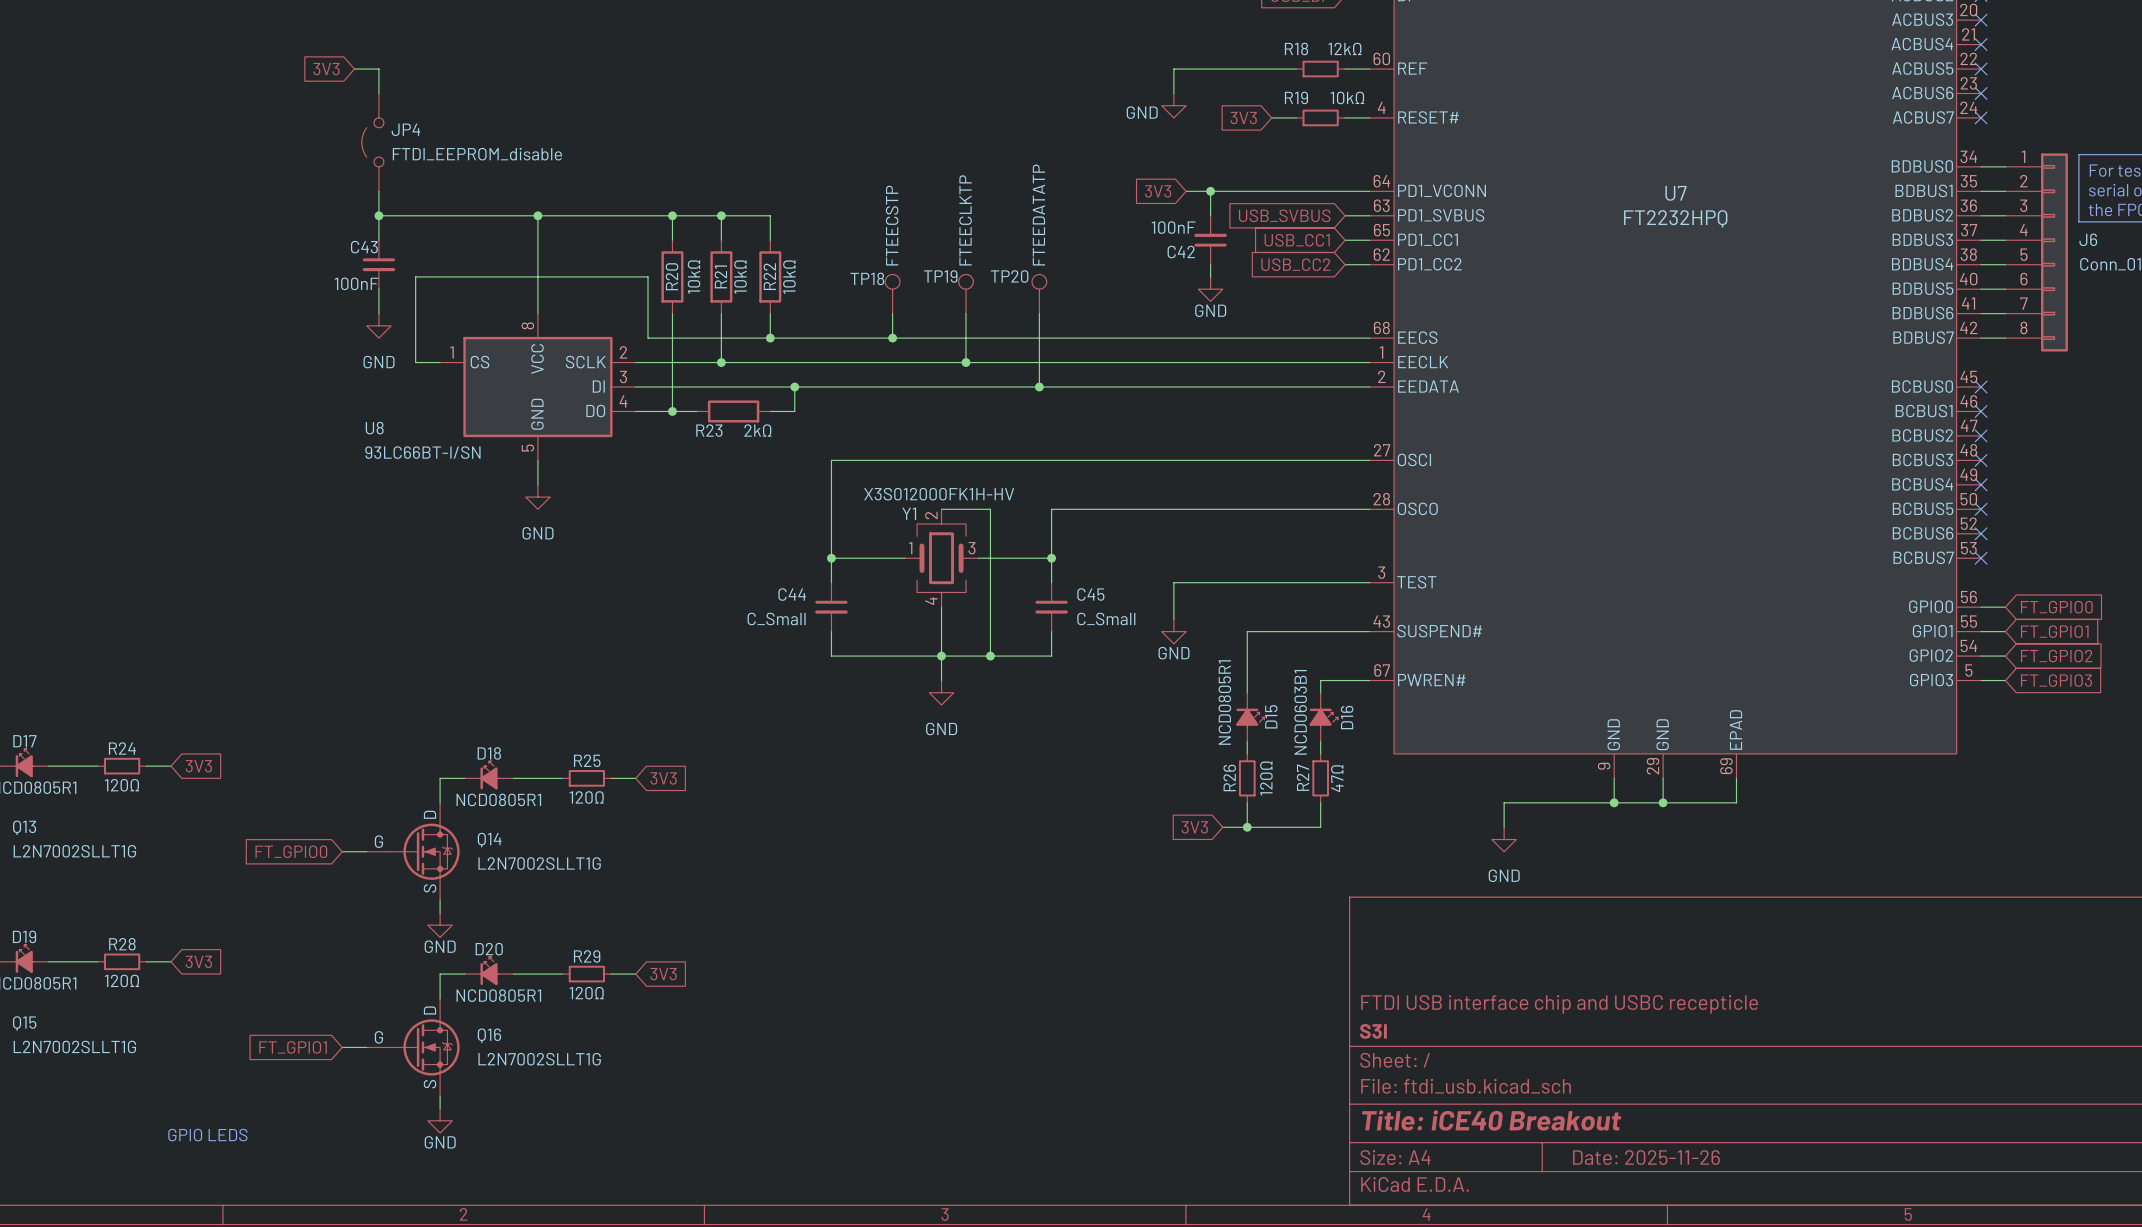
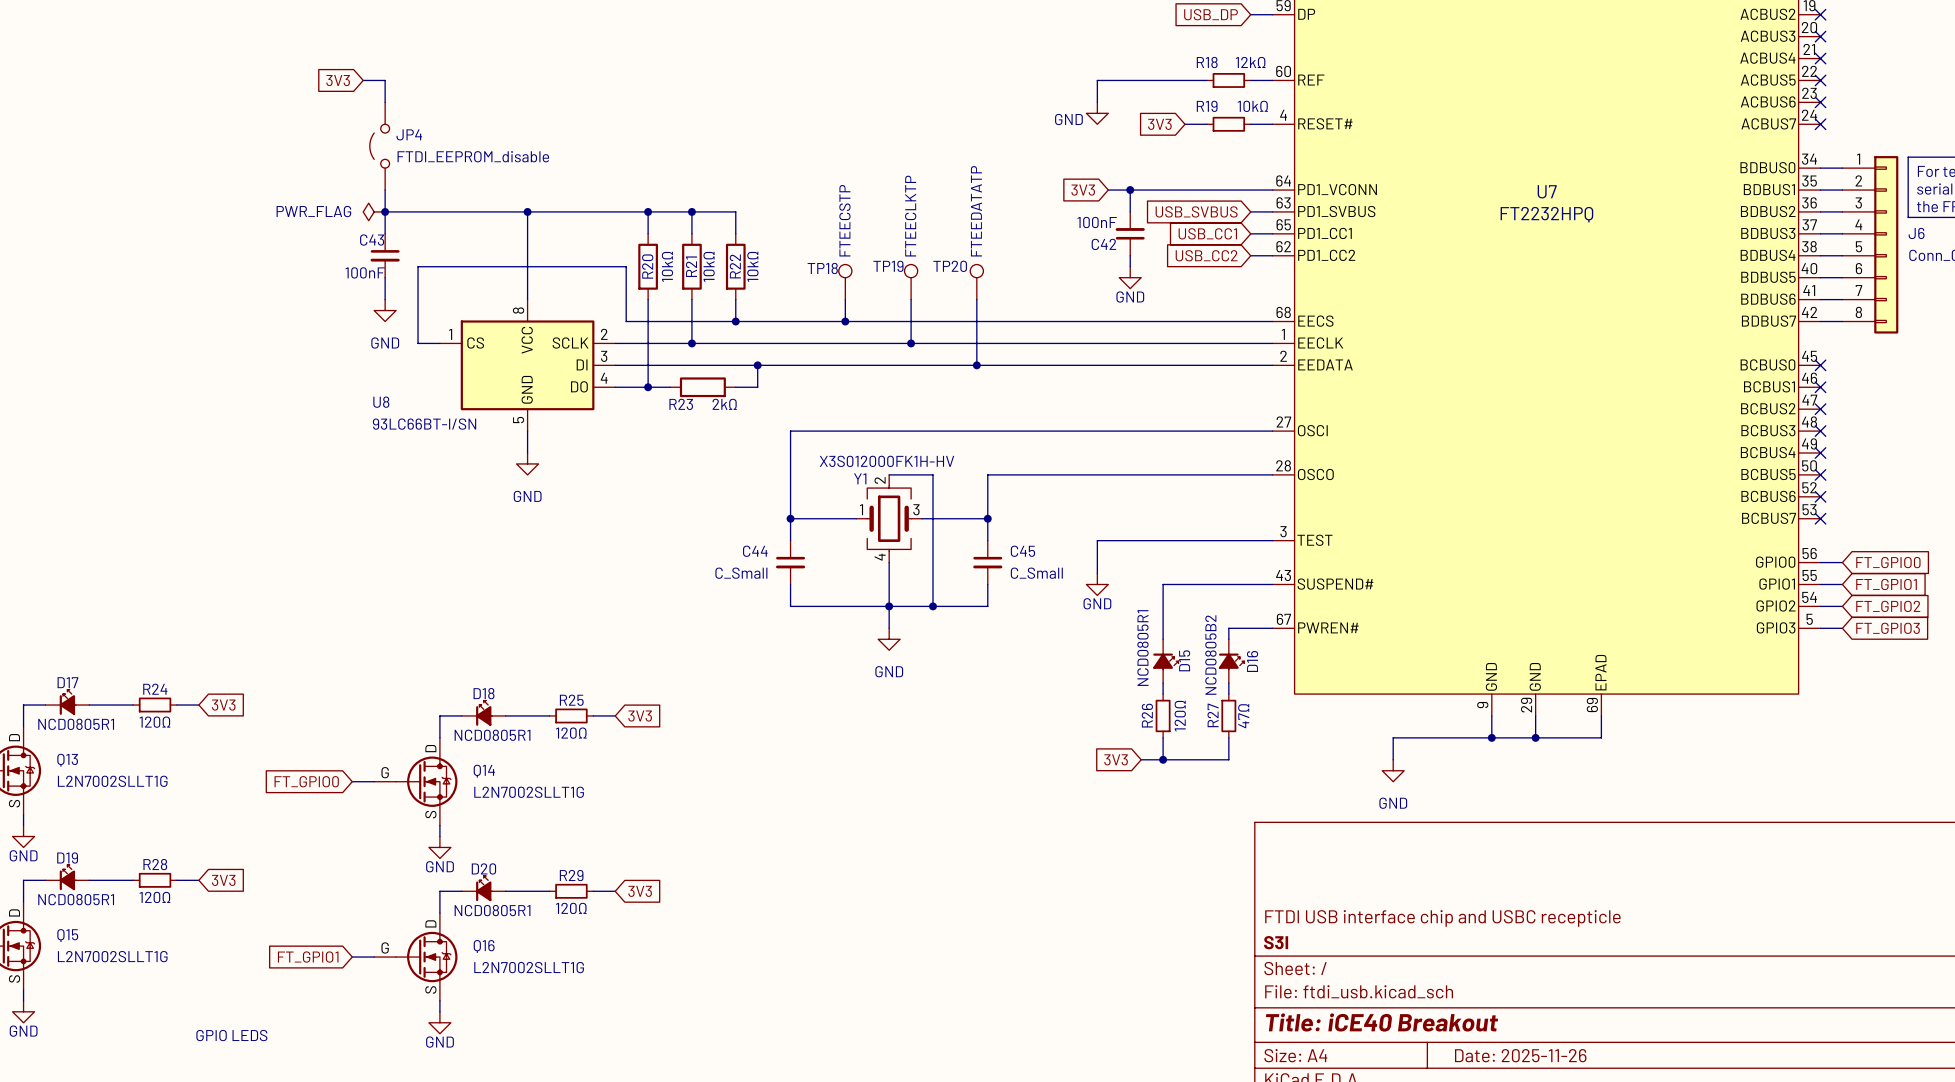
power symbol: none -> PWR_FLAG (374, 211)
D16 value: NCD0603B1 (1300, 712) -> NCD0805B2 (1210, 655)

